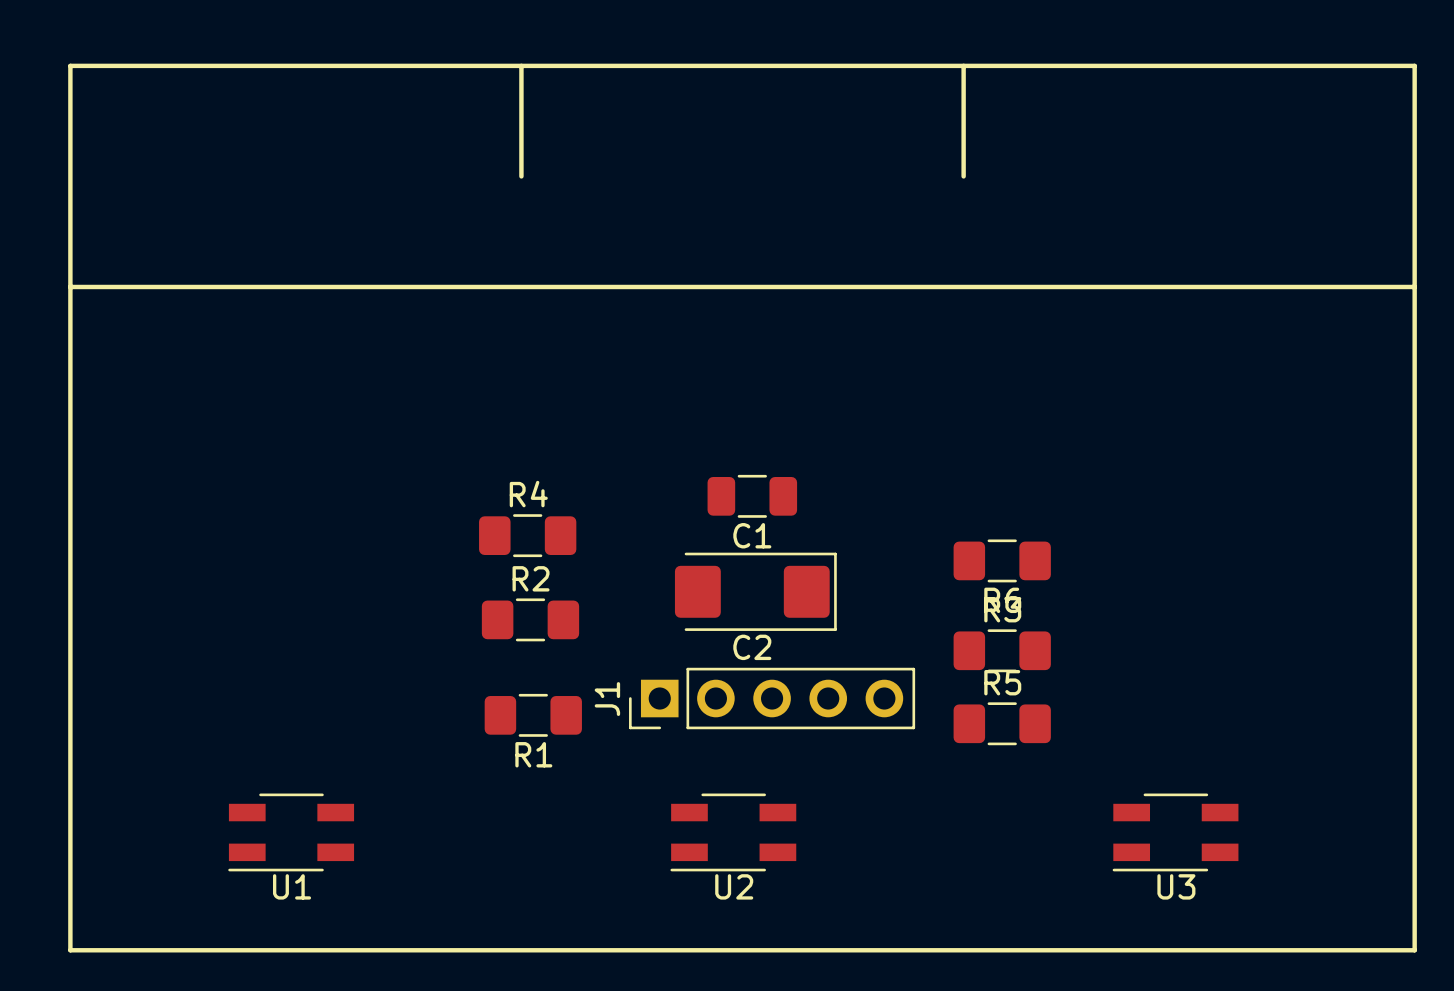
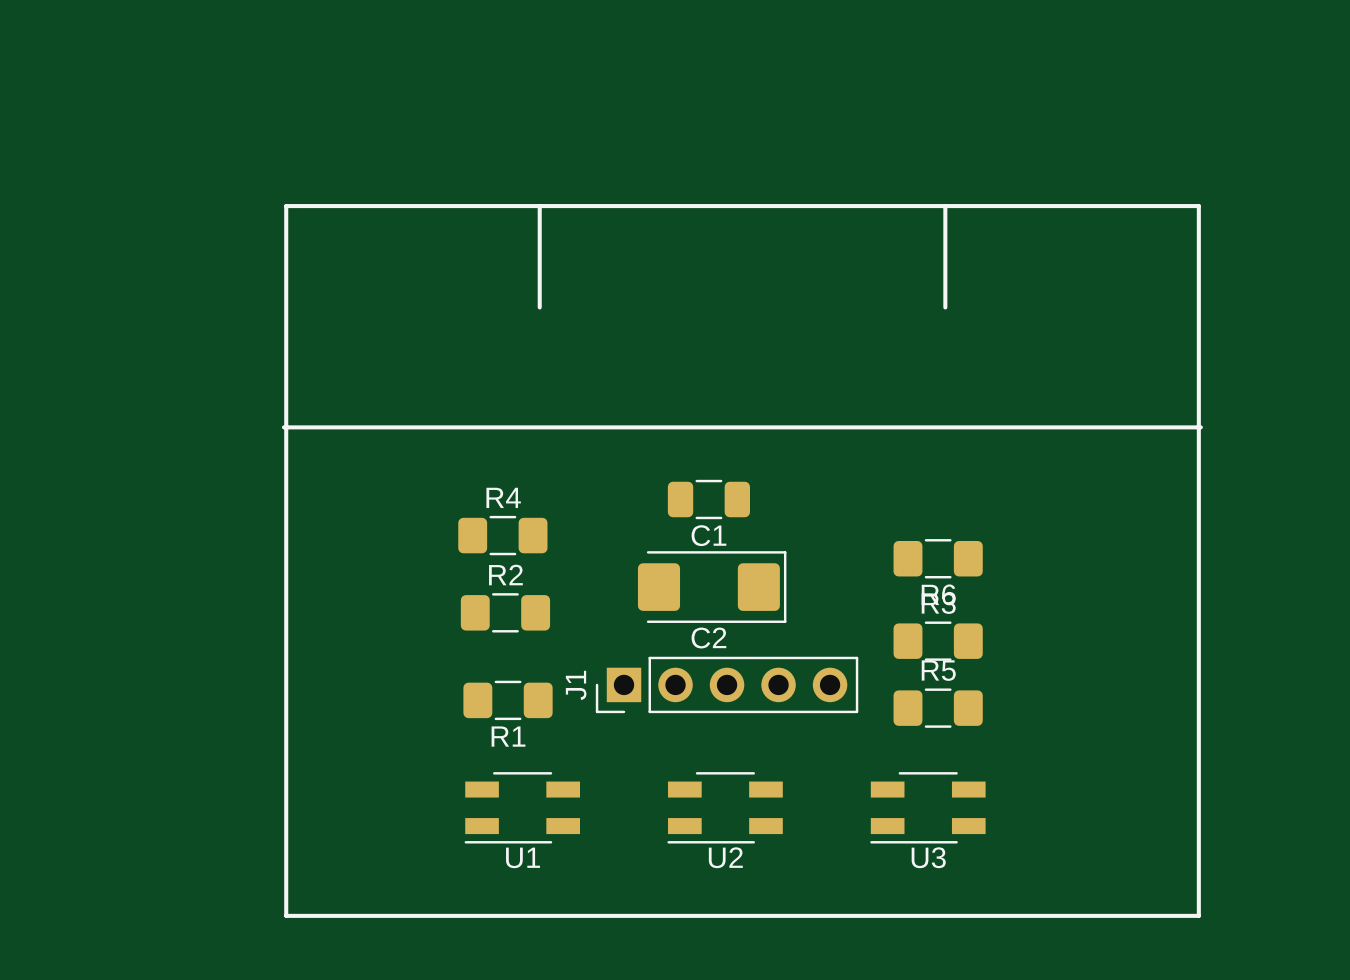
line: (521, 65) (521, 176) -> (539, 206) (539, 307)
line: (963, 65) (963, 176) -> (945, 206) (945, 307)
line: (70, 286) (1414, 286) -> none
line: none -> (283, 427) (1200, 427)
U1 position: (291, 832) -> (522, 807)
U2 position: (733, 832) -> (725, 807)
U3 position: (1175, 832) -> (927, 807)
line: (291, 950) (70, 950) (70, 65) (1414, 65) (1414, 950) (1286, 950) -> (286, 915) (286, 206) (1198, 206) (1198, 915)

